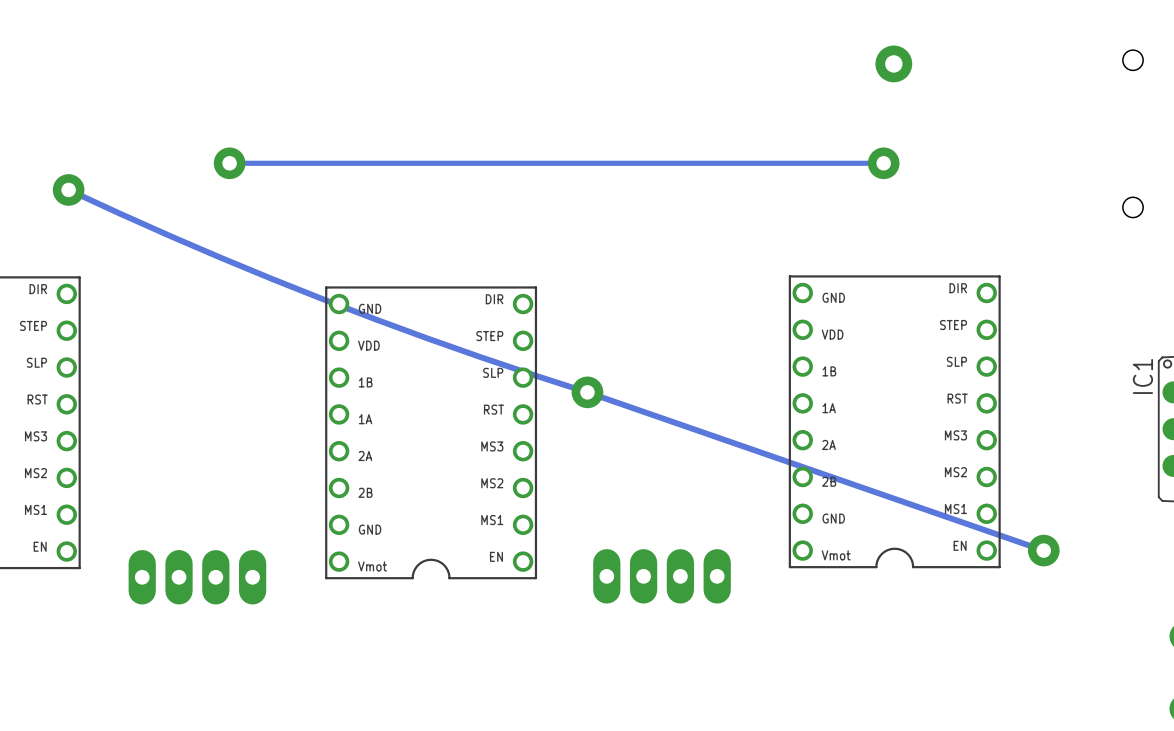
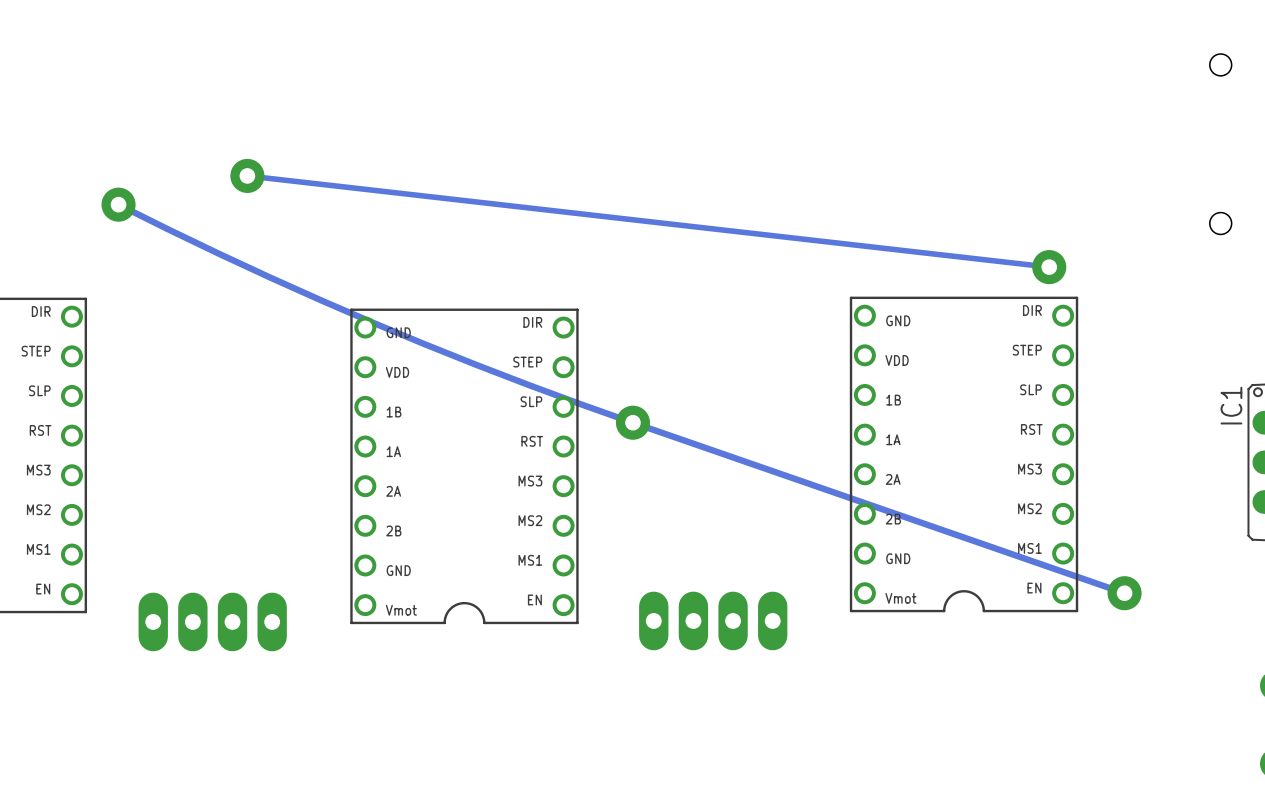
via: (893, 63) -> none
track: (883, 163) (229, 163) -> (1049, 267) (247, 175)
via: (883, 163) -> none
track: (68, 189) (170, 235) (324, 299) (481, 357) (587, 392) -> (118, 204) (219, 253) (372, 322) (527, 384) (632, 422)
via position: (68, 189) -> (118, 204)
via: none -> (1049, 267)

